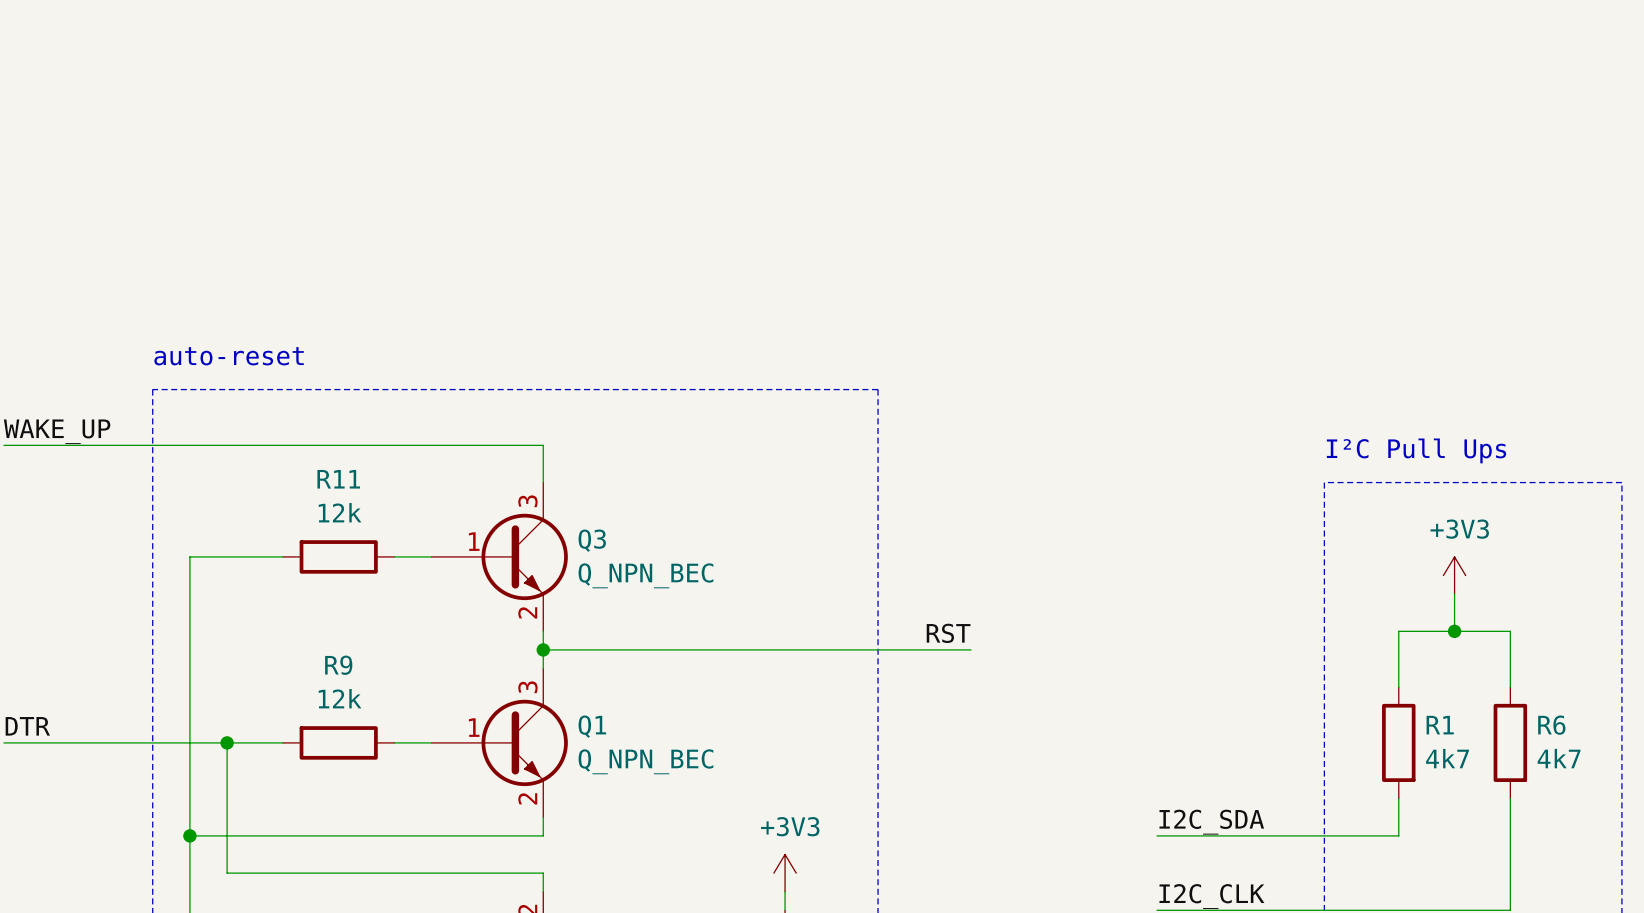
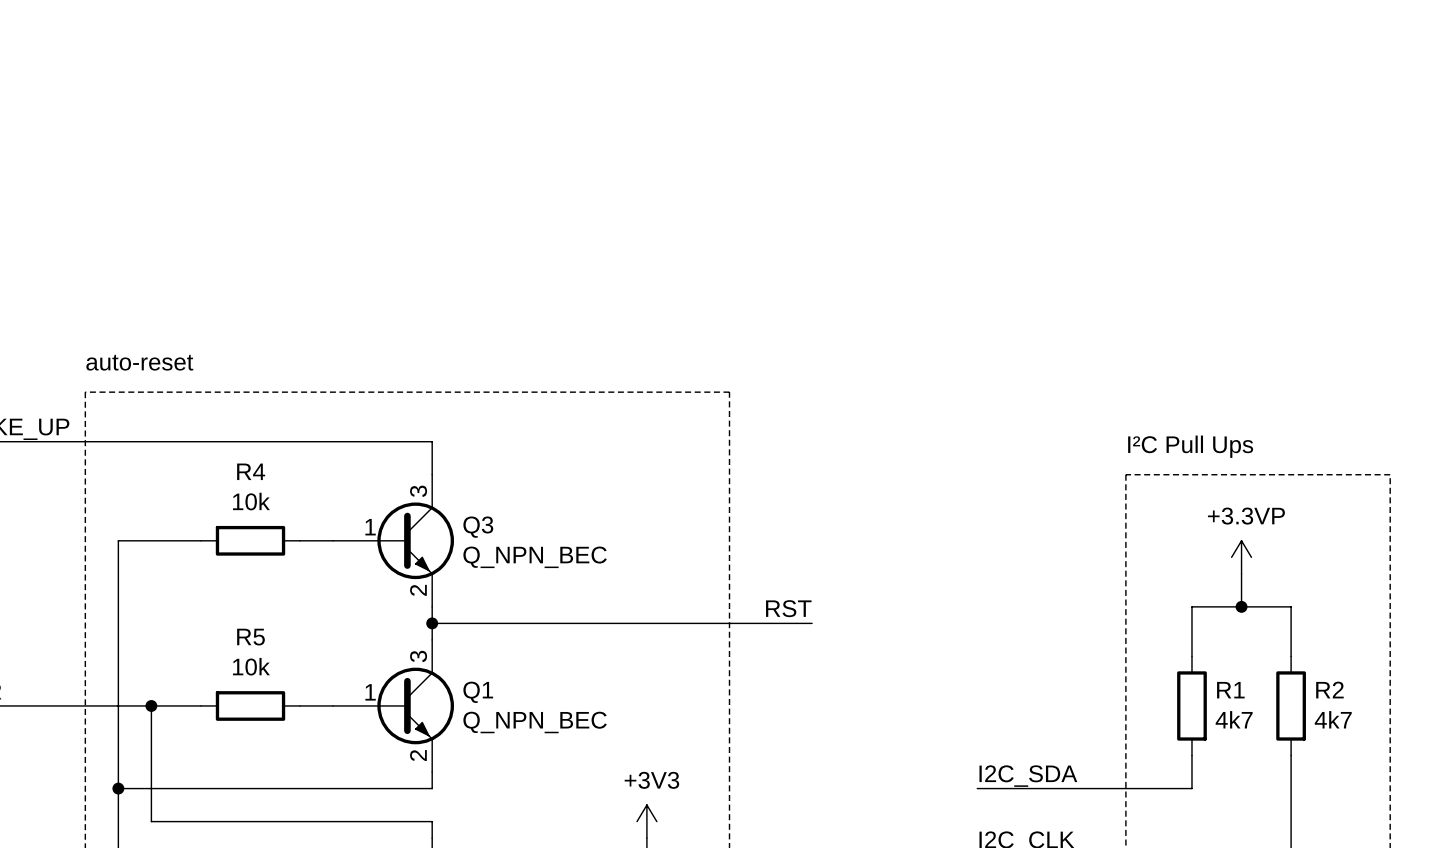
R11 name: R11 (338, 479) -> R4 (251, 471)
R11 value: 12k (340, 512) -> 10k (251, 501)
power symbol: +3V3 (1454, 575) -> +3.3VP (1241, 557)
R9 name: R9 (338, 665) -> R5 (250, 637)
R9 value: 12k (340, 698) -> 10k (251, 666)
R6 name: R6 (1551, 725) -> R2 (1329, 690)

